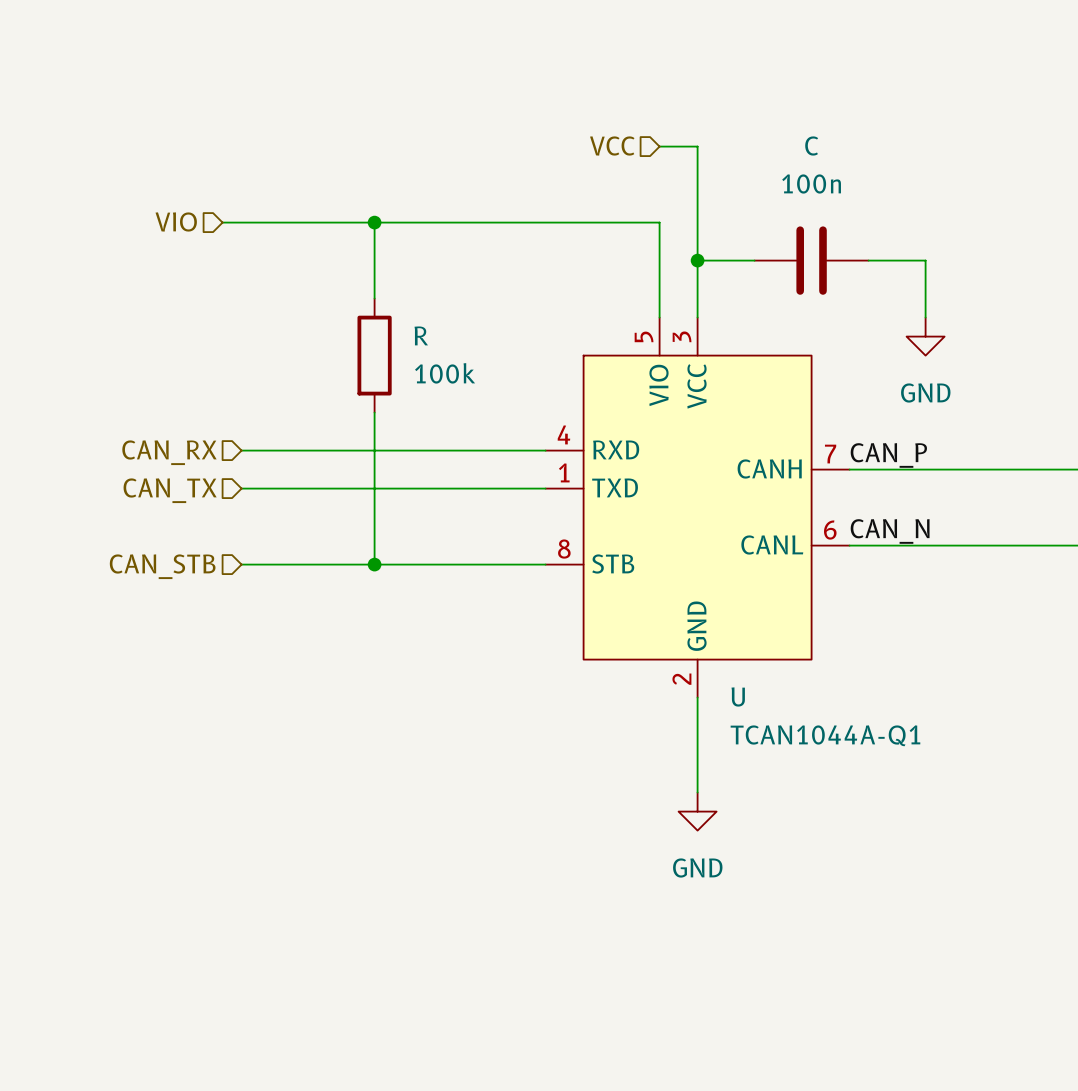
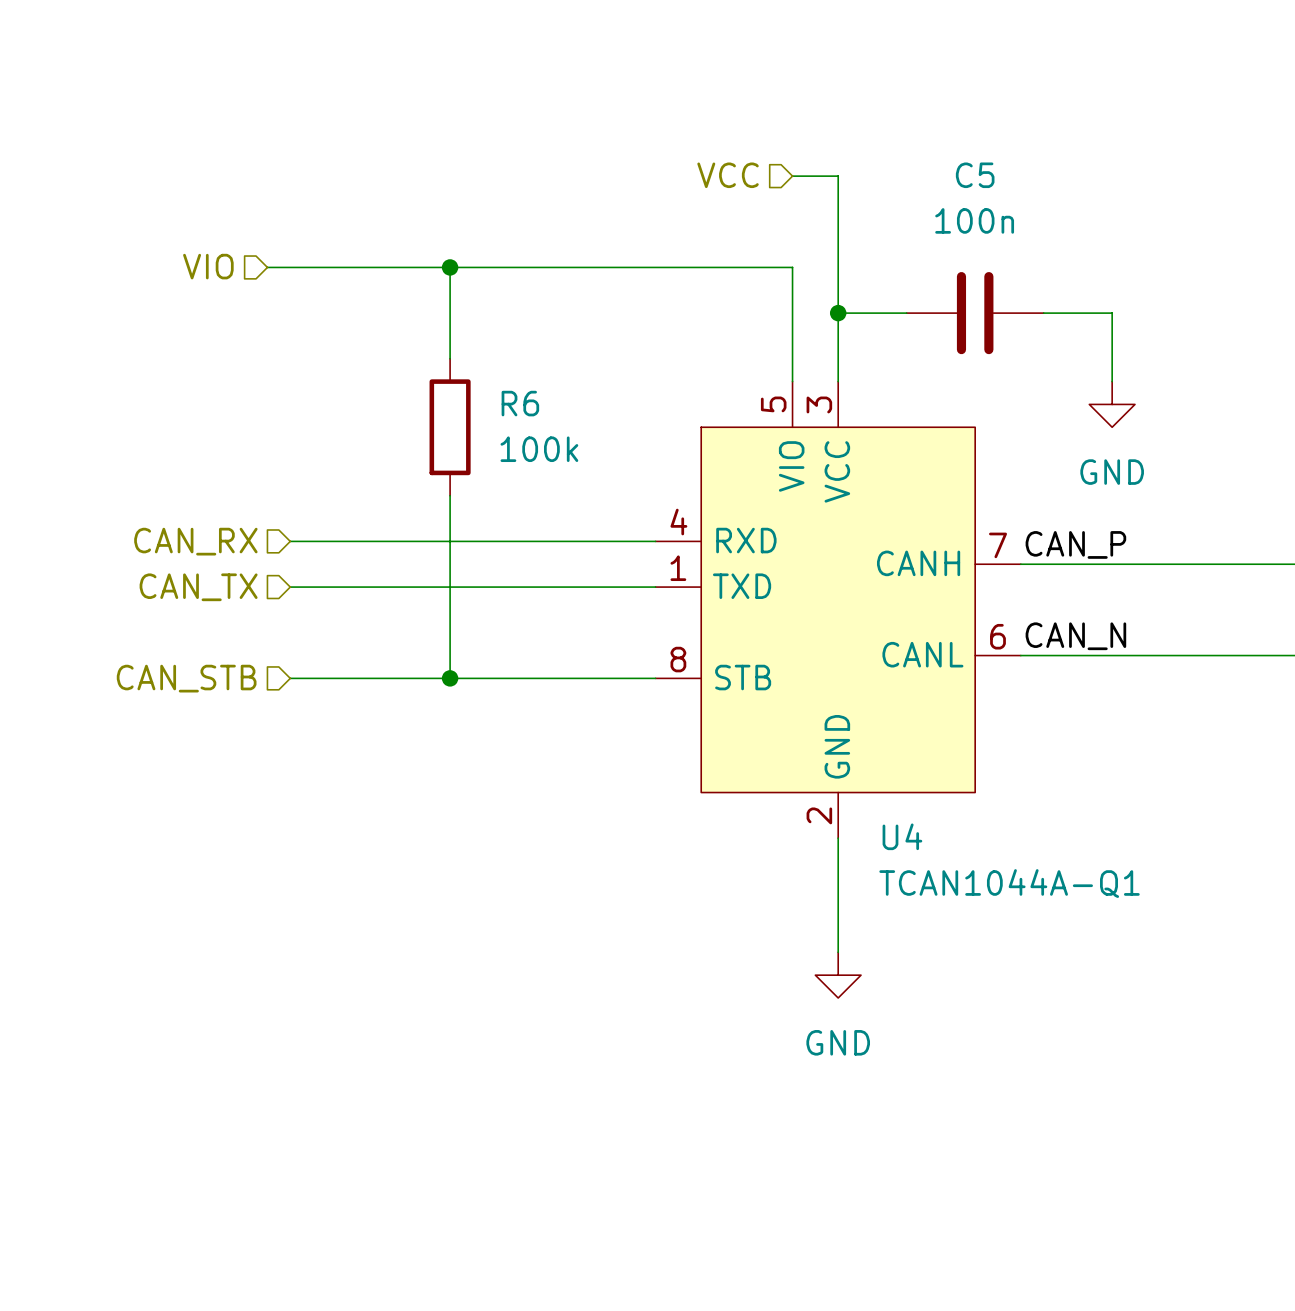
C name: C (811, 145) -> C5 (975, 175)
R name: R (421, 335) -> R6 (520, 403)
U name: U (738, 696) -> U4 (902, 836)

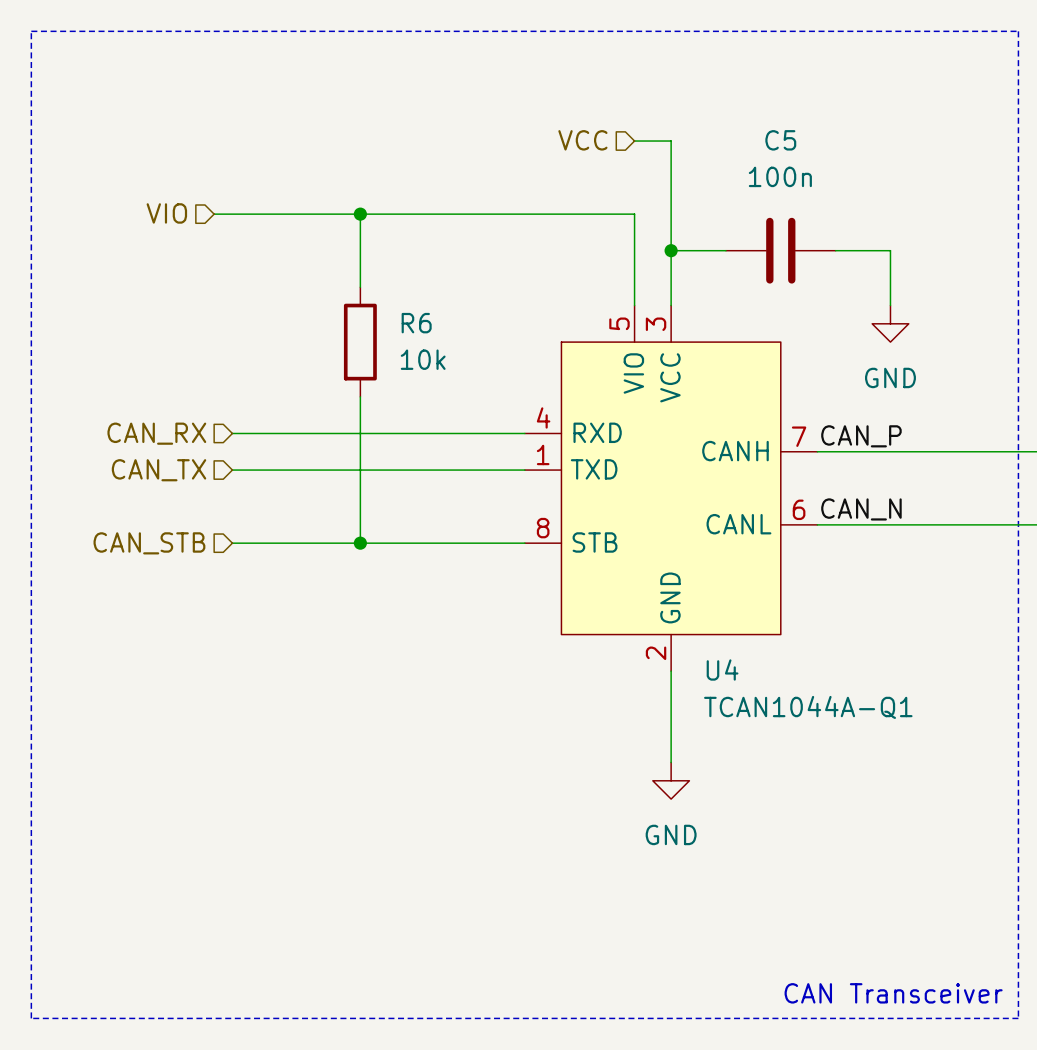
line: none -> (31, 31) (1018, 31) (1018, 1018) (31, 1018) (31, 31)
R6 value: 100k (539, 449) -> 10k (423, 359)
text: none -> CAN Transceiver (893, 993)

